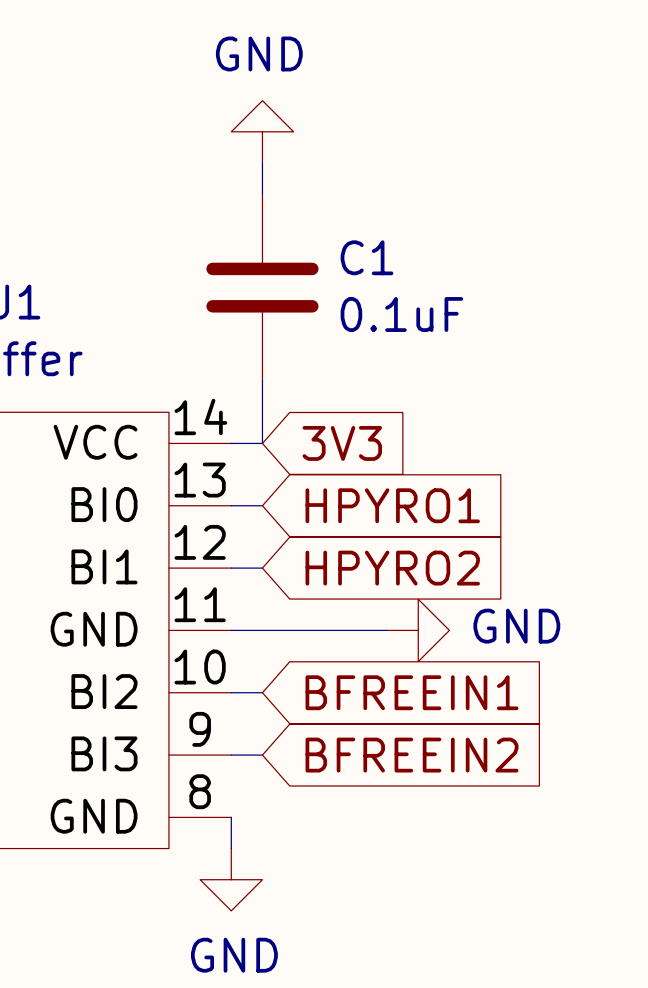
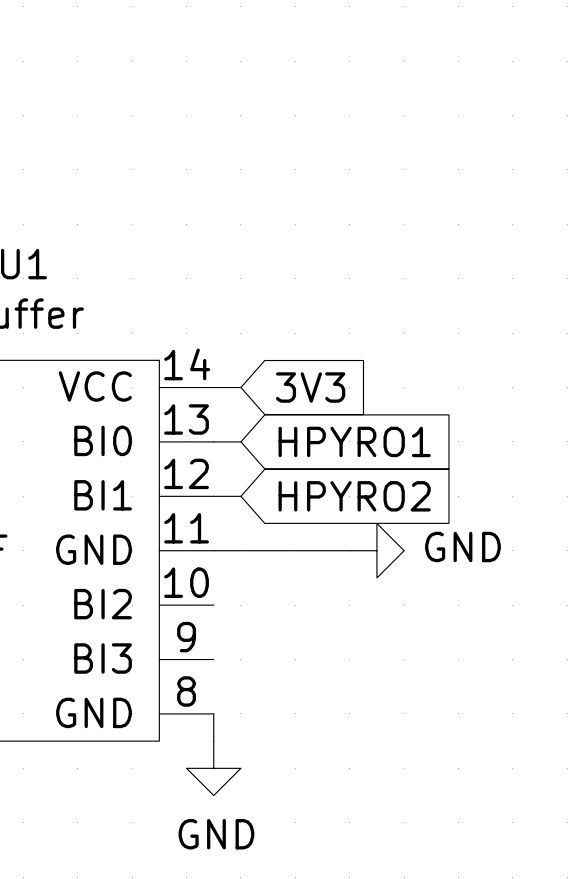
power symbol: GND (262, 131) -> none
wire: (262, 162) (262, 194) -> none
C1: 0.1uF (262, 287) -> none
wire: (262, 381) (262, 443) -> none
wire: (231, 692) (262, 692) -> none
global label: BFREEIN1 (412, 692) -> none
wire: (231, 755) (262, 755) -> none
global label: BFREEIN2 (412, 755) -> none

